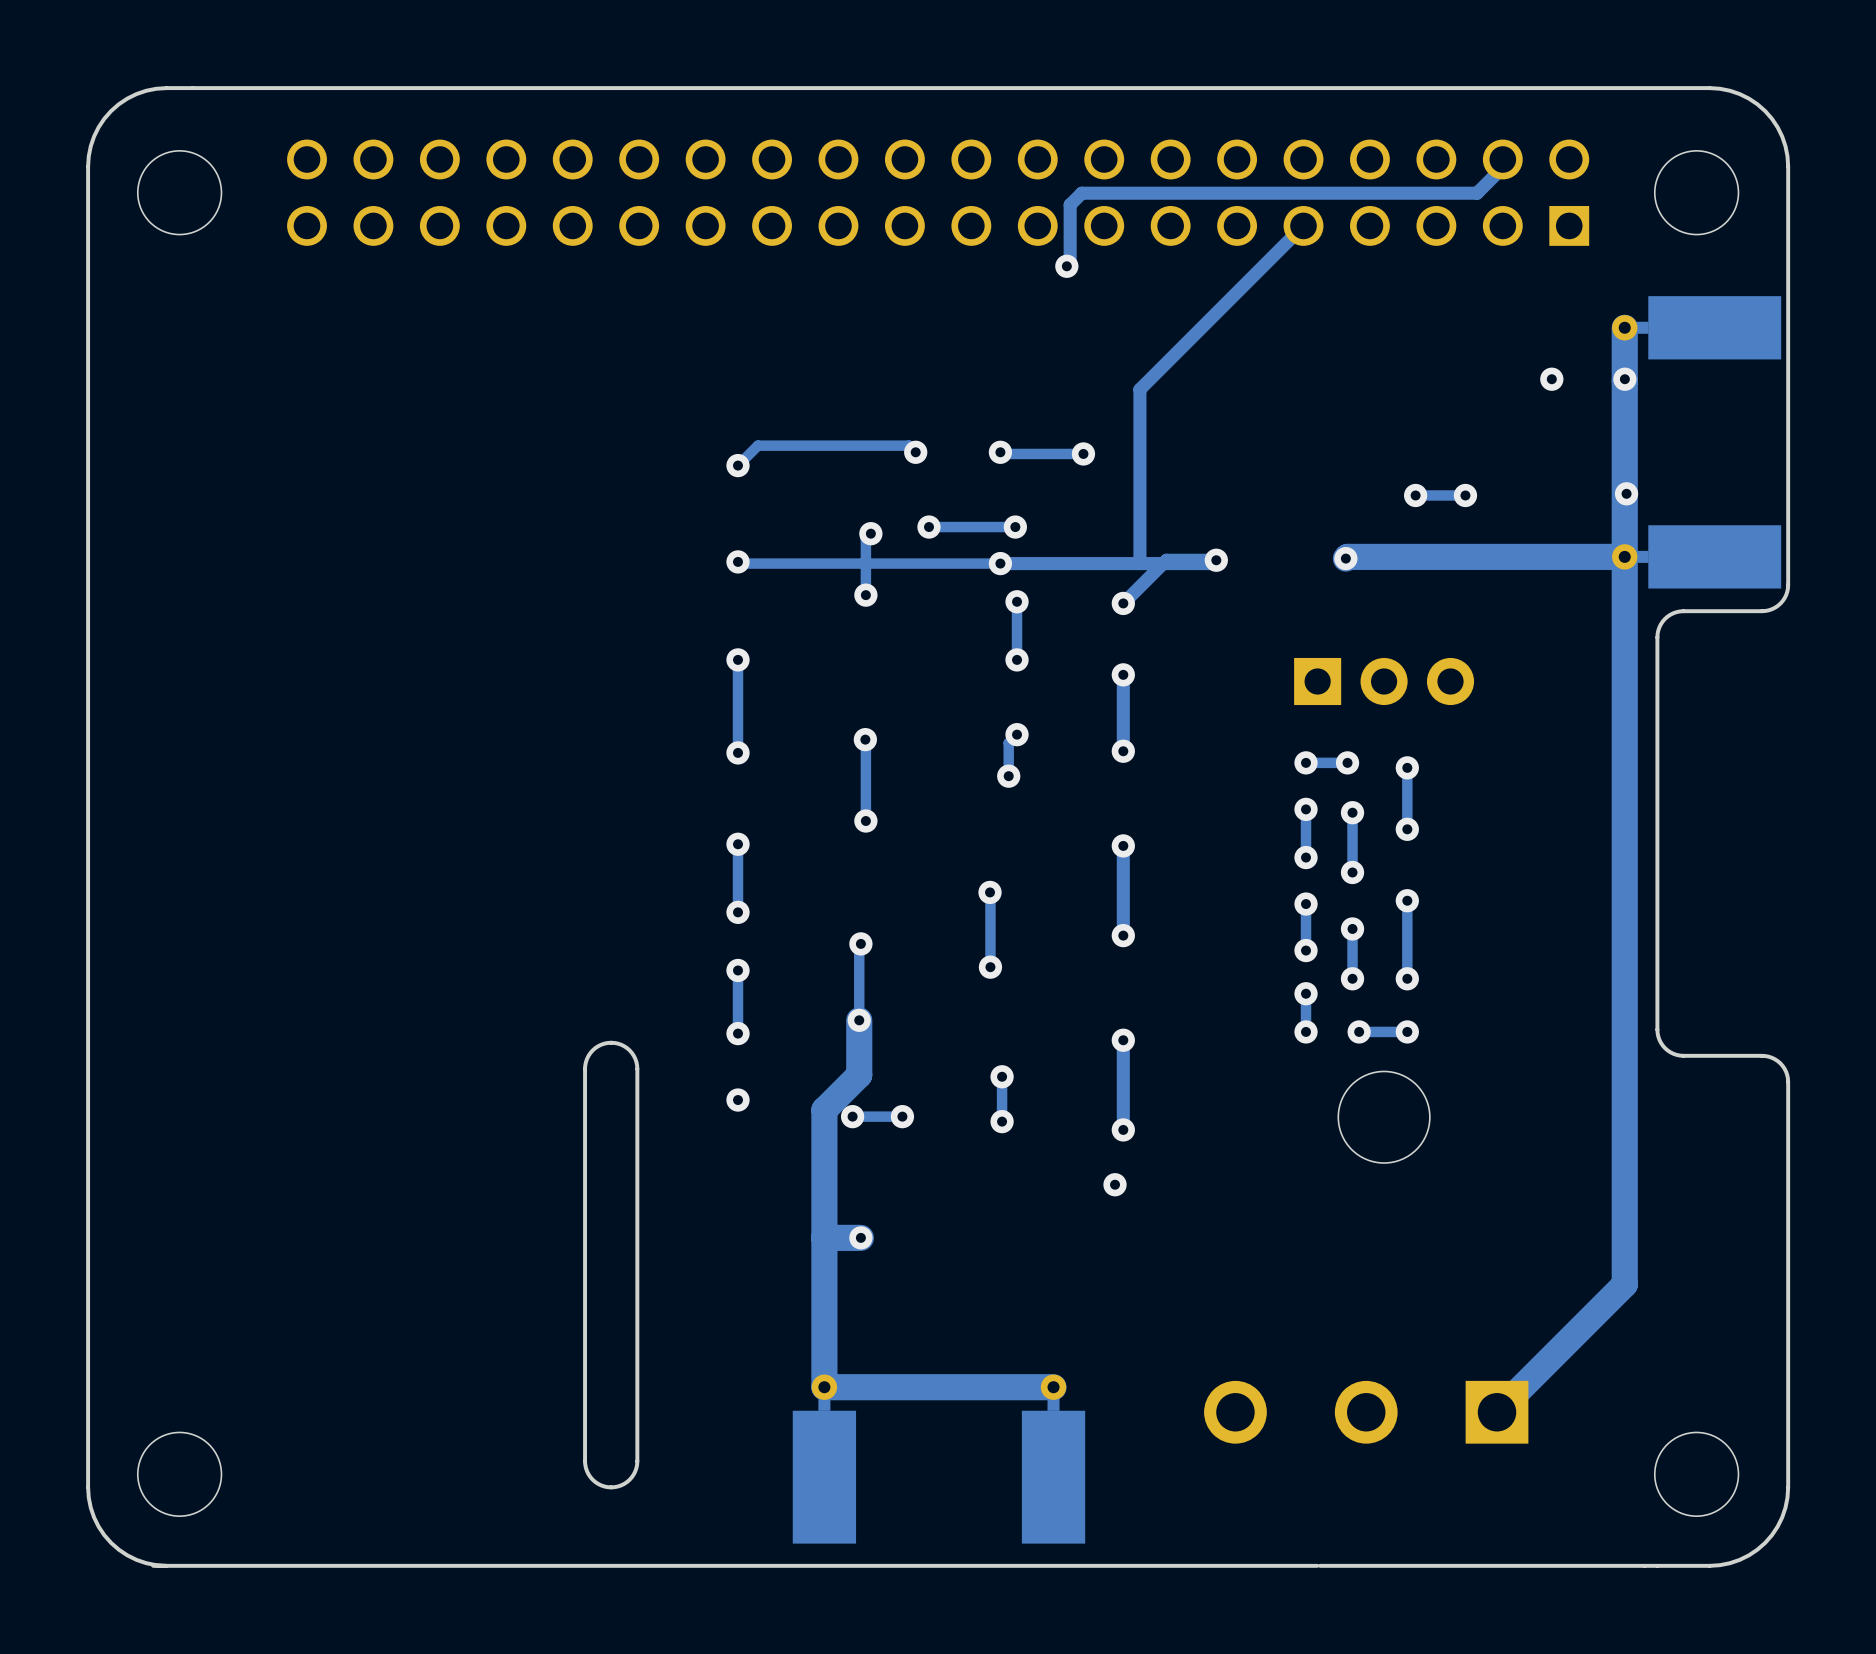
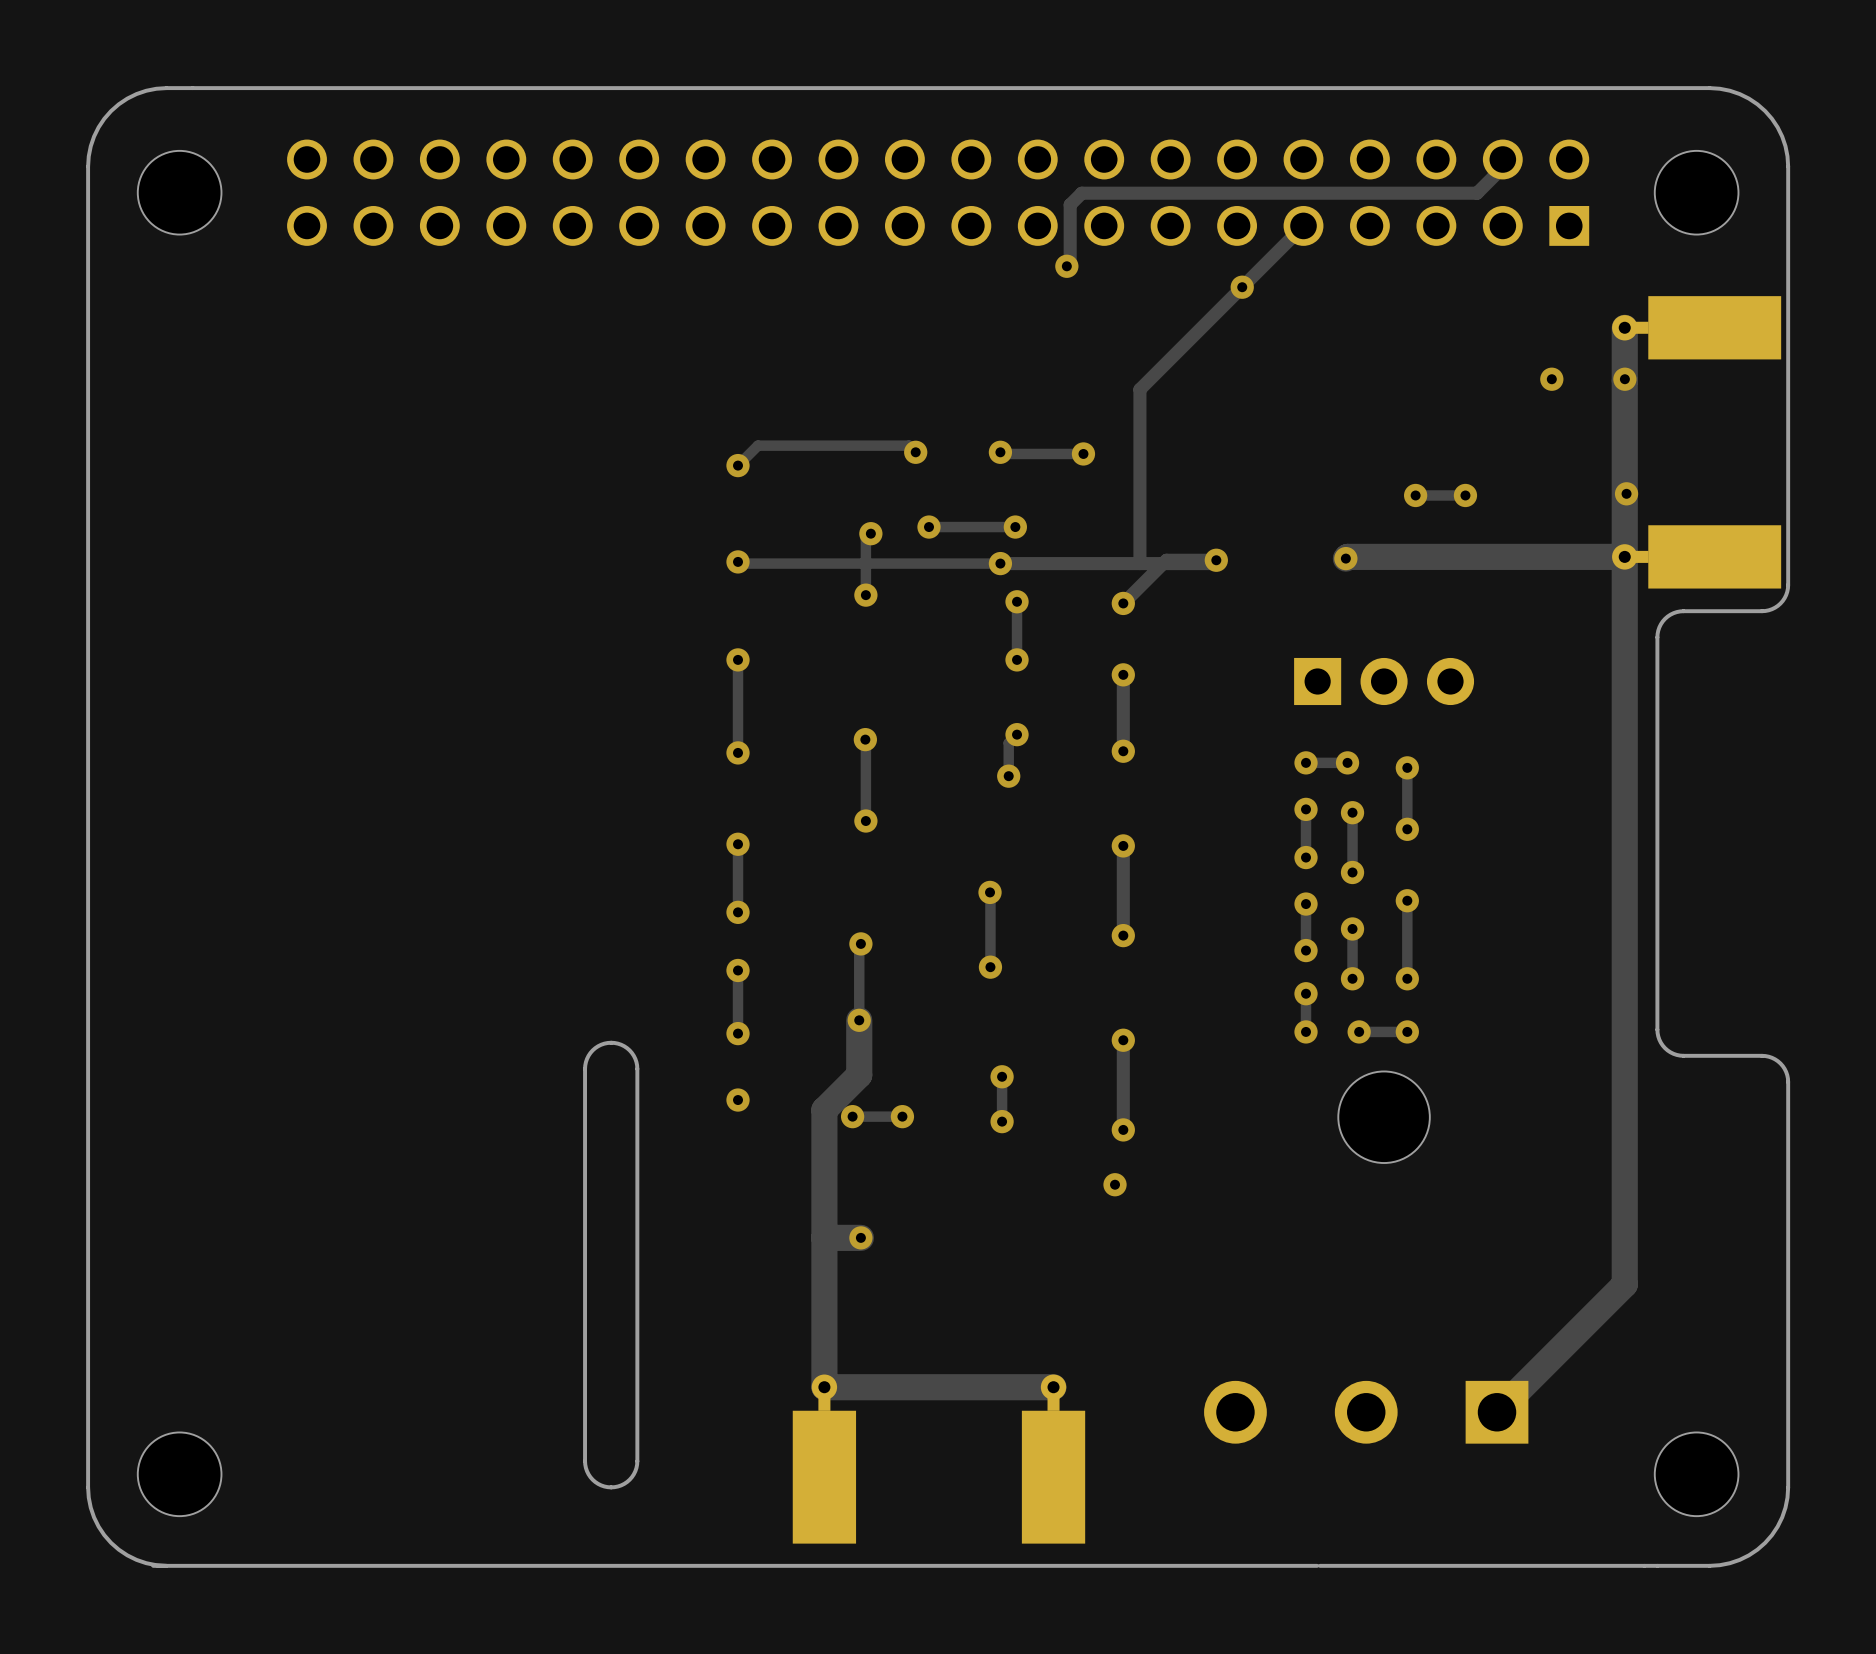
via: none -> (1242, 287)

